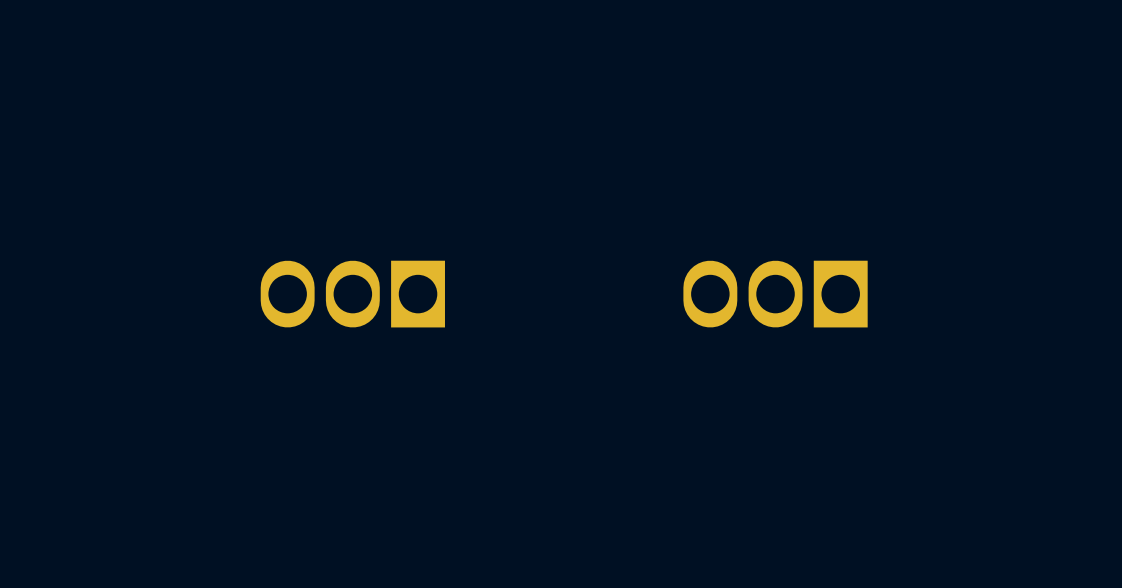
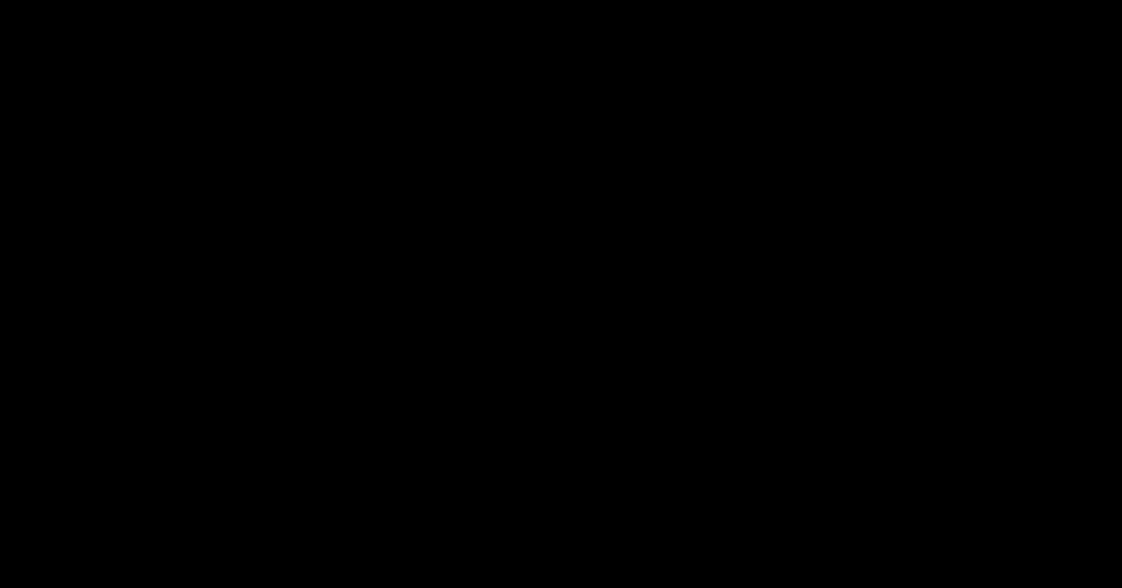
part: (352, 294) -> none
part: (775, 294) -> none

